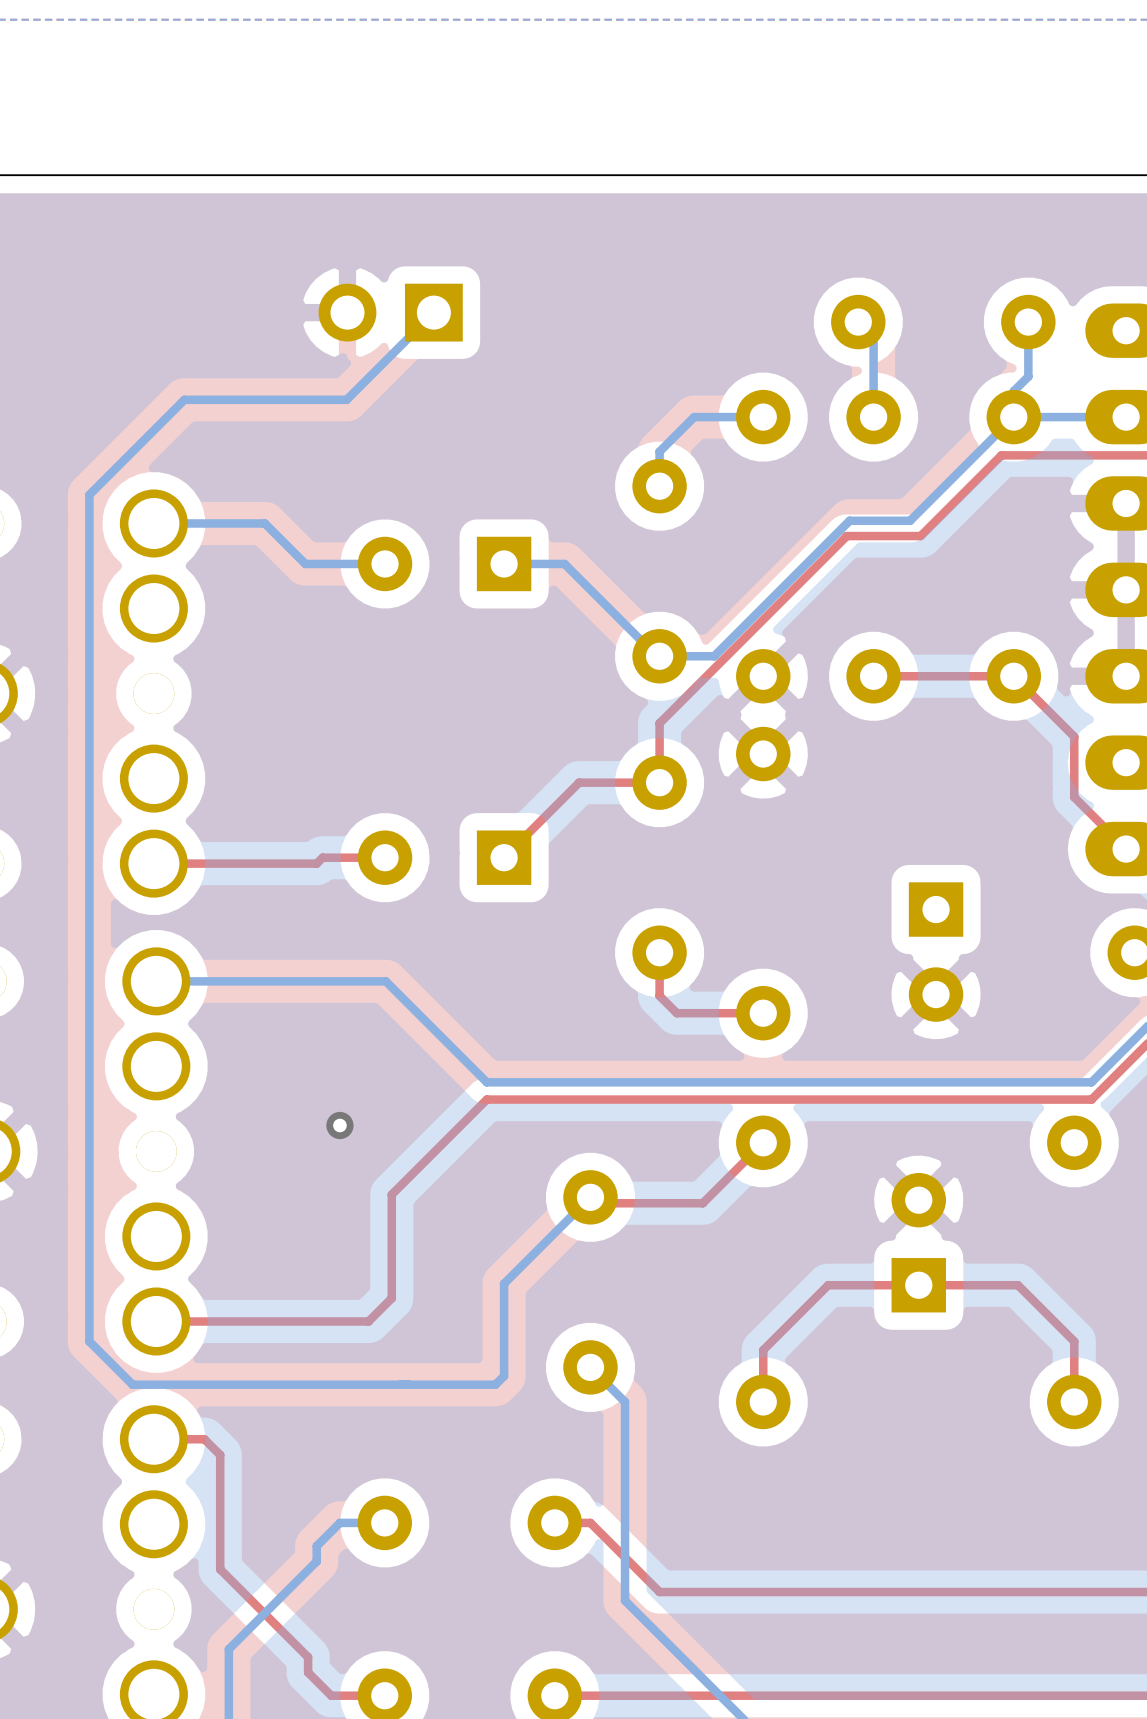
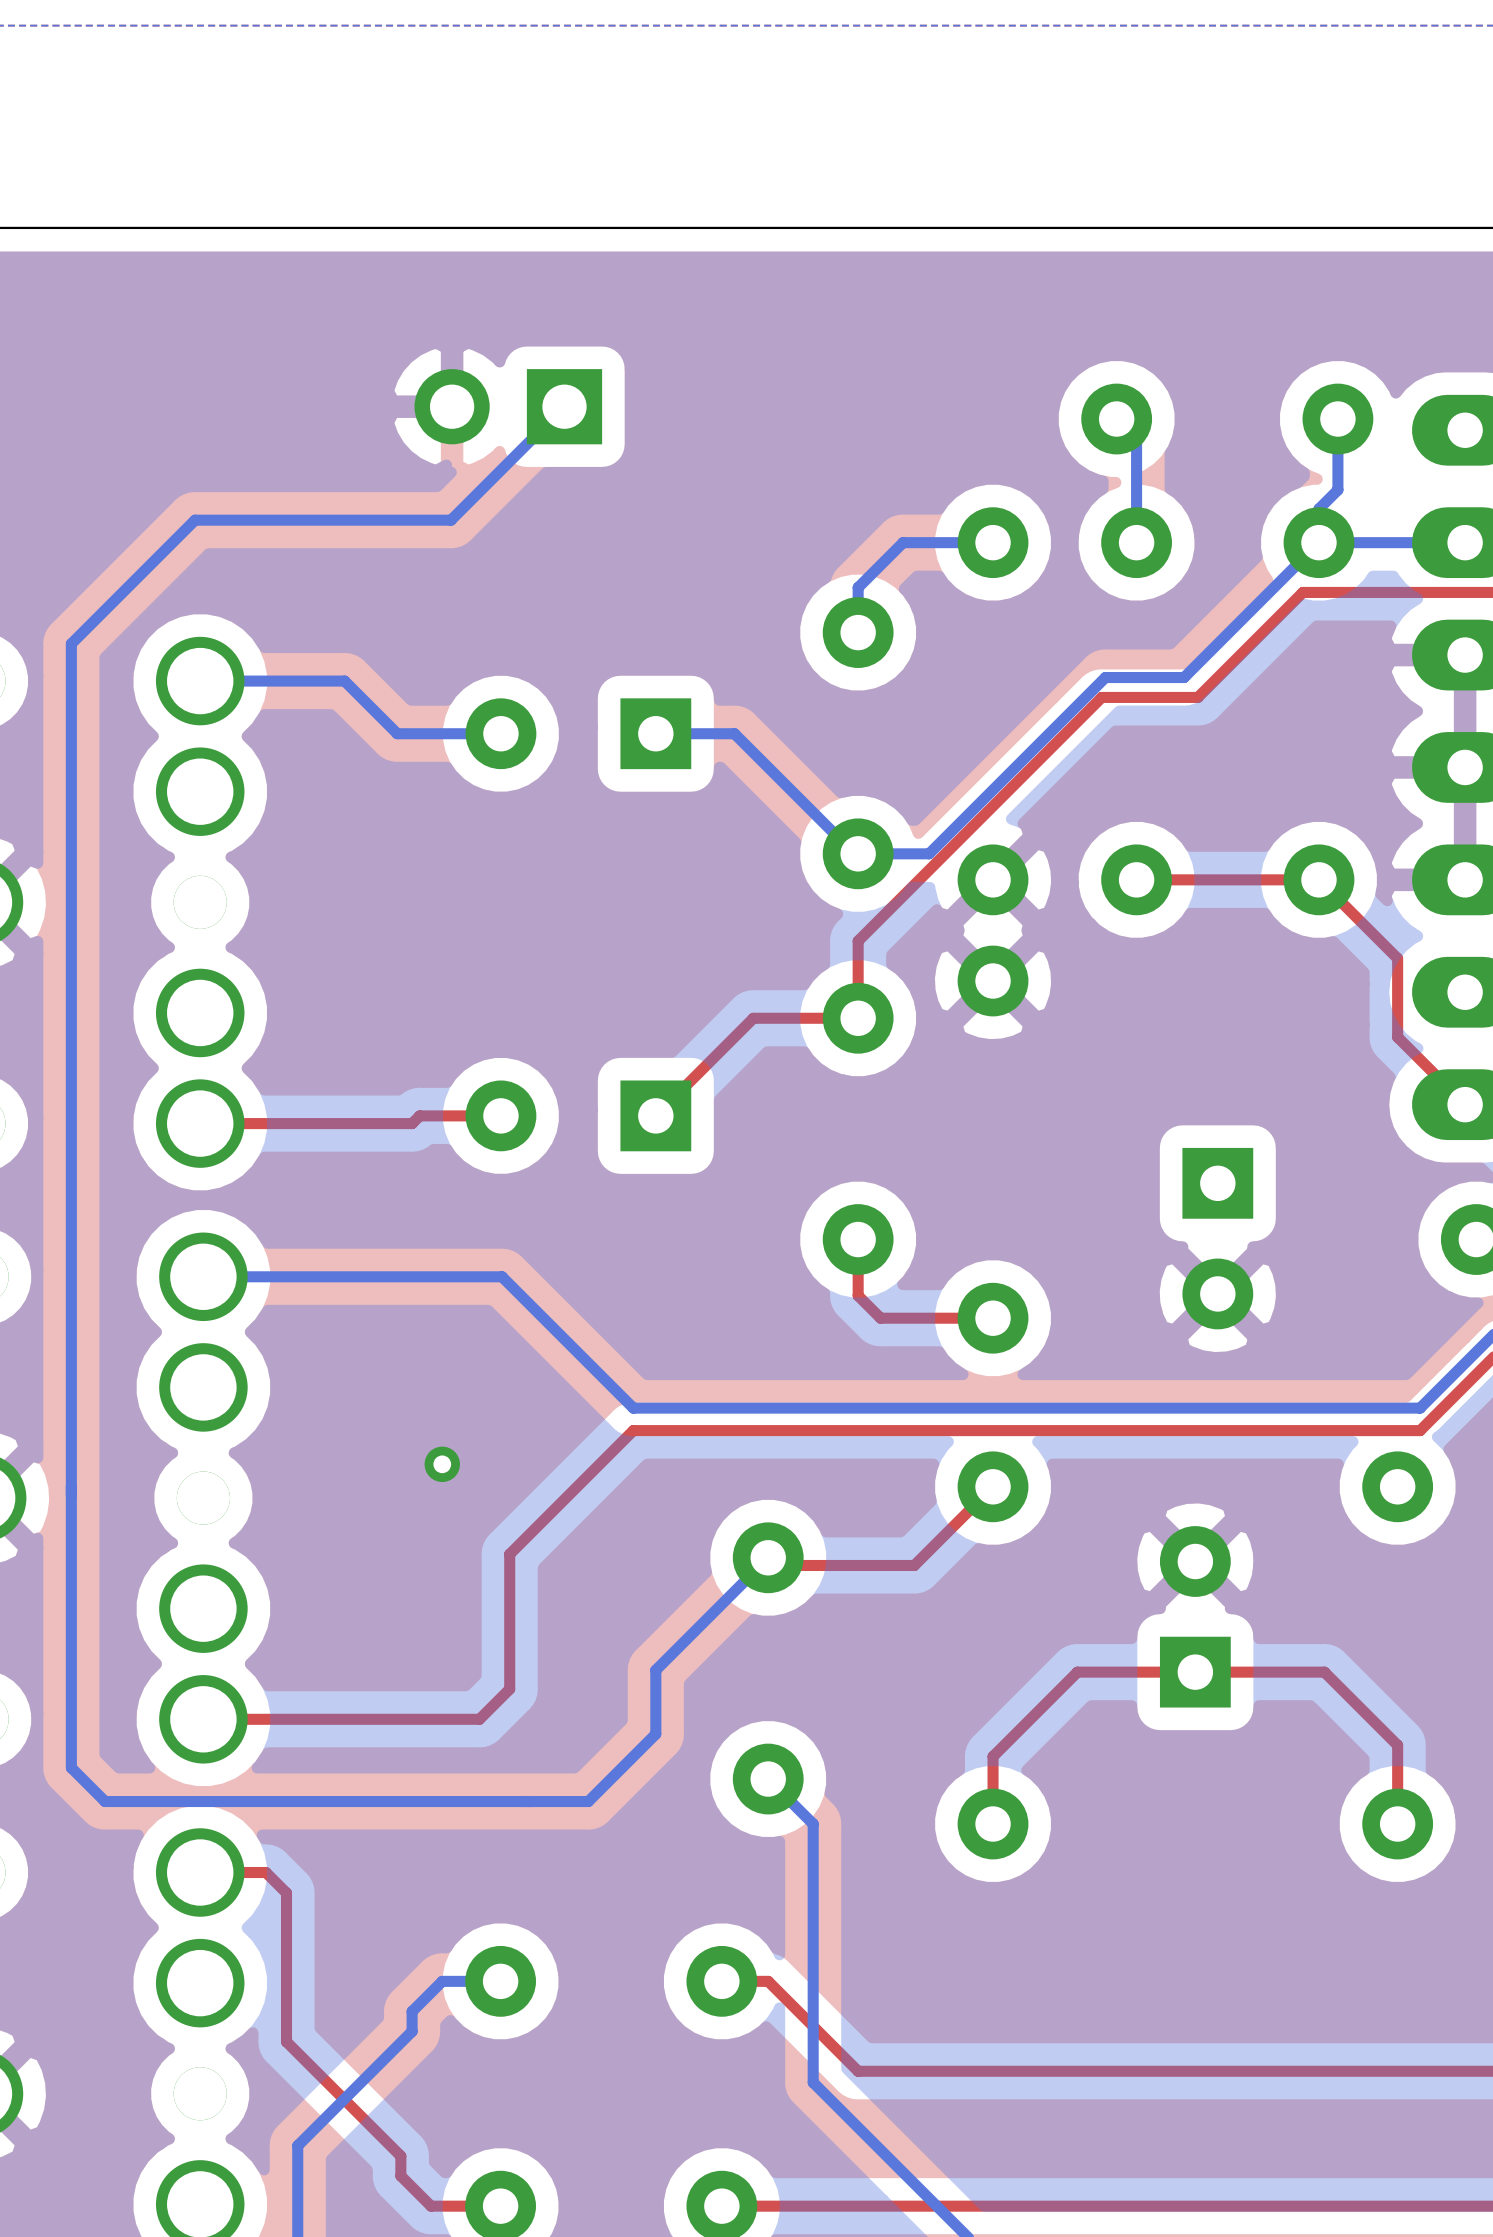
bottom track: (184, 399) (89, 494) (89, 1341) (132, 1384) -> (239, 520) (194, 520) (71, 643) (71, 1767) (105, 1801) (172, 1801)
bottom track: (504, 1332) (504, 1376) (495, 1384) (452, 1384) -> (655, 1734) (588, 1801)

